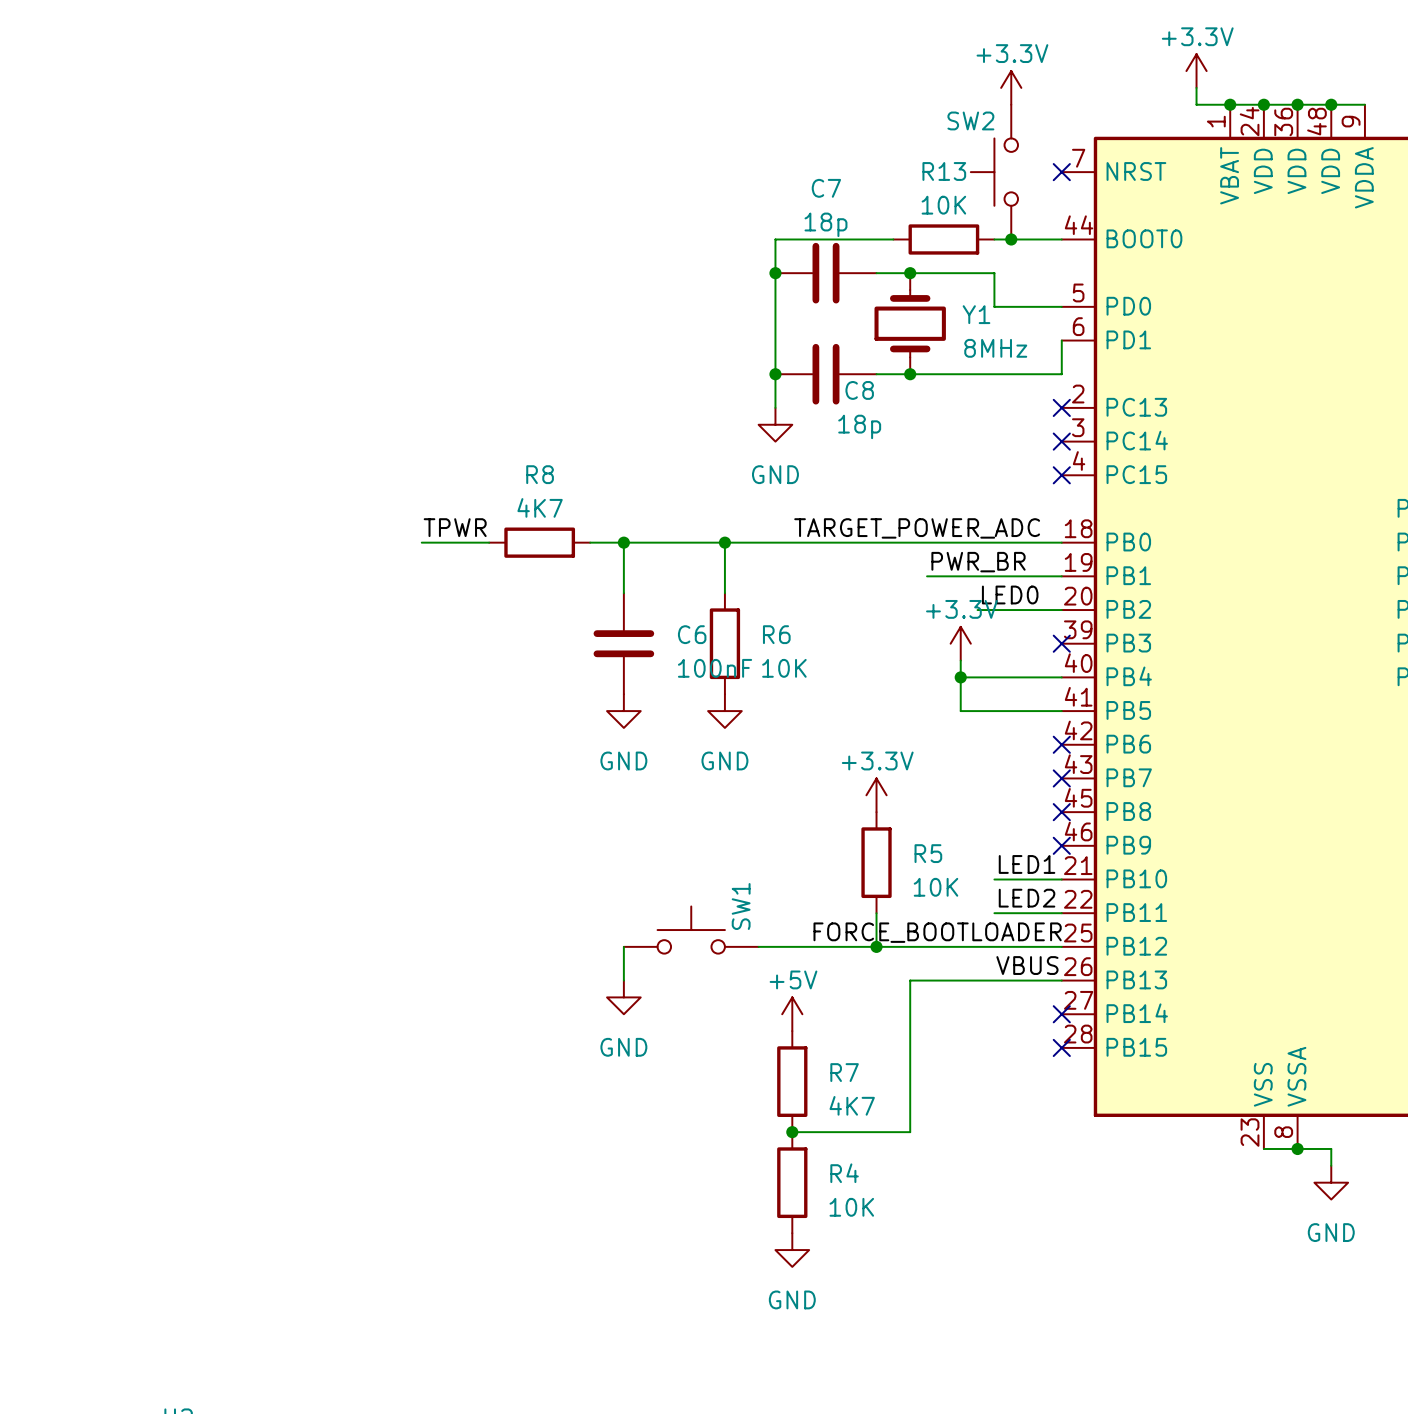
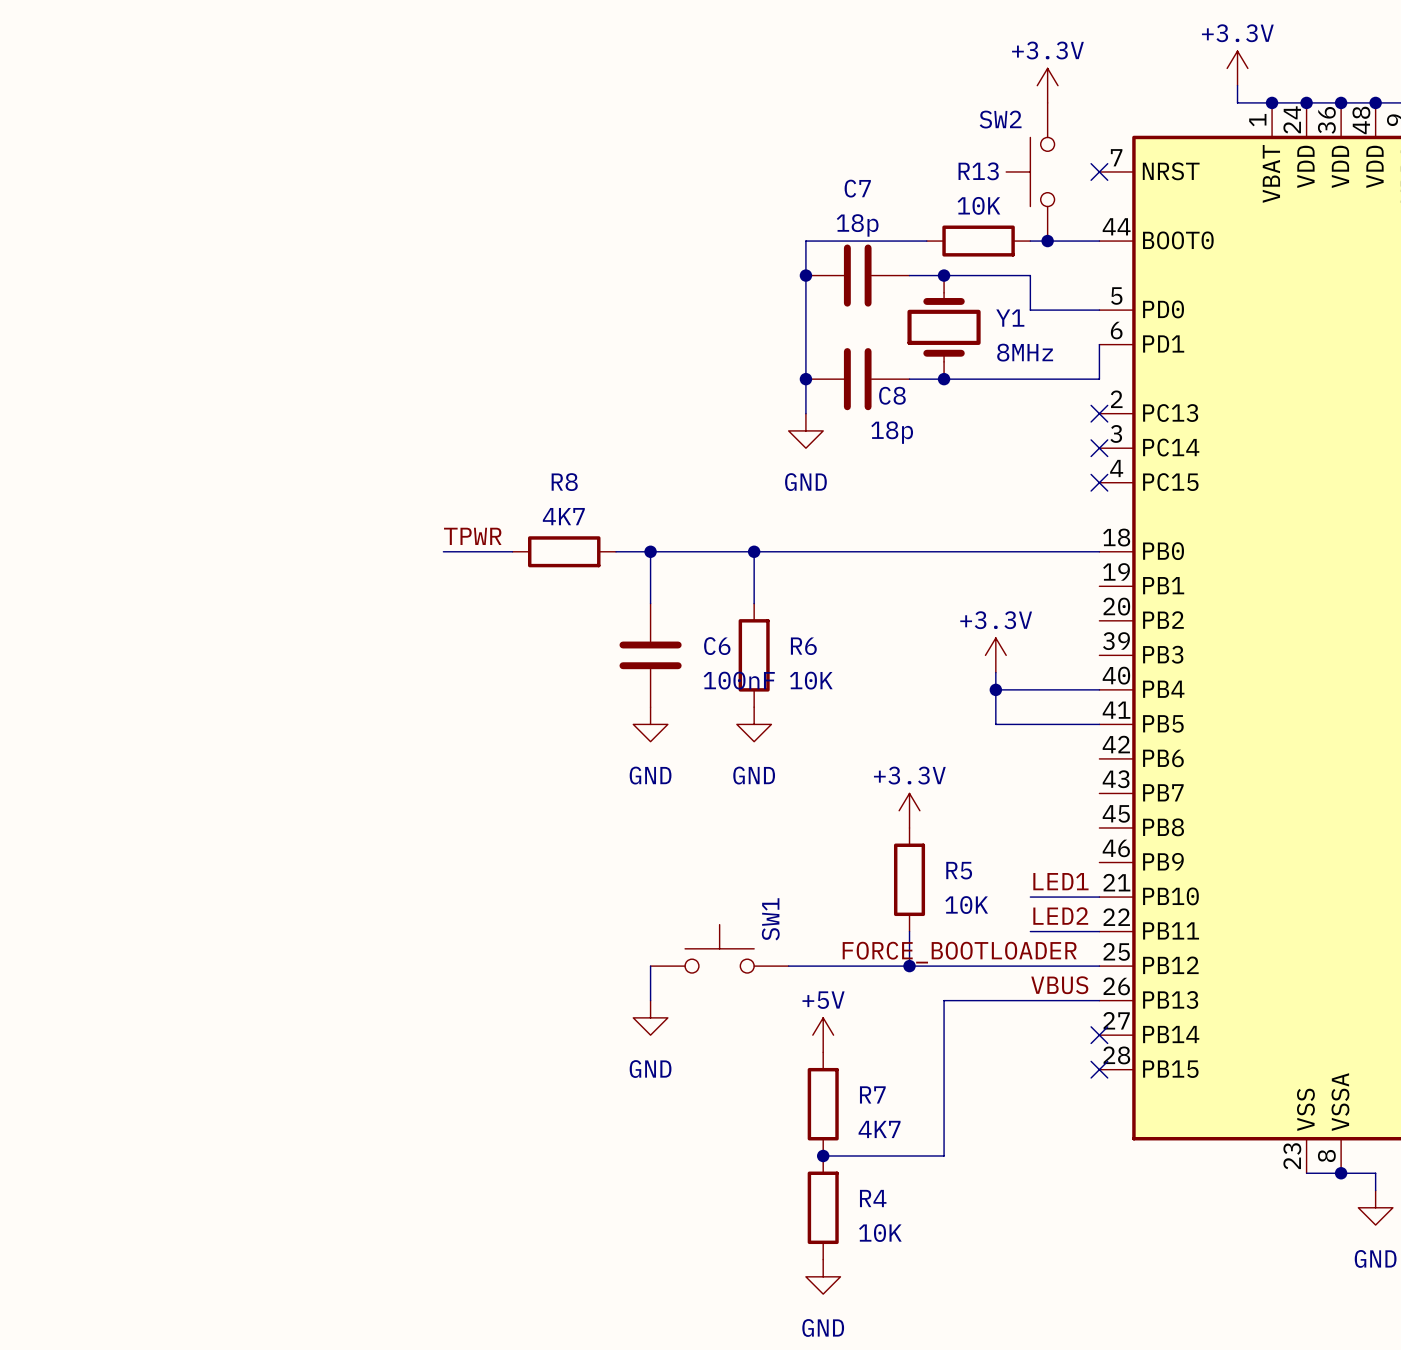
label: TARGET_POWER_ADC (917, 528) -> none
label: PWR_BR (978, 562) -> none
wire: (927, 576) (1061, 576) -> none
label: LED0 (1010, 594) -> none
wire: (977, 610) (1061, 610) -> none
no-connect mark: (1061, 643) -> none
no-connect mark: (1061, 744) -> none
no-connect mark: (1061, 778) -> none
no-connect mark: (1061, 812) -> none
no-connect mark: (1061, 845) -> none

